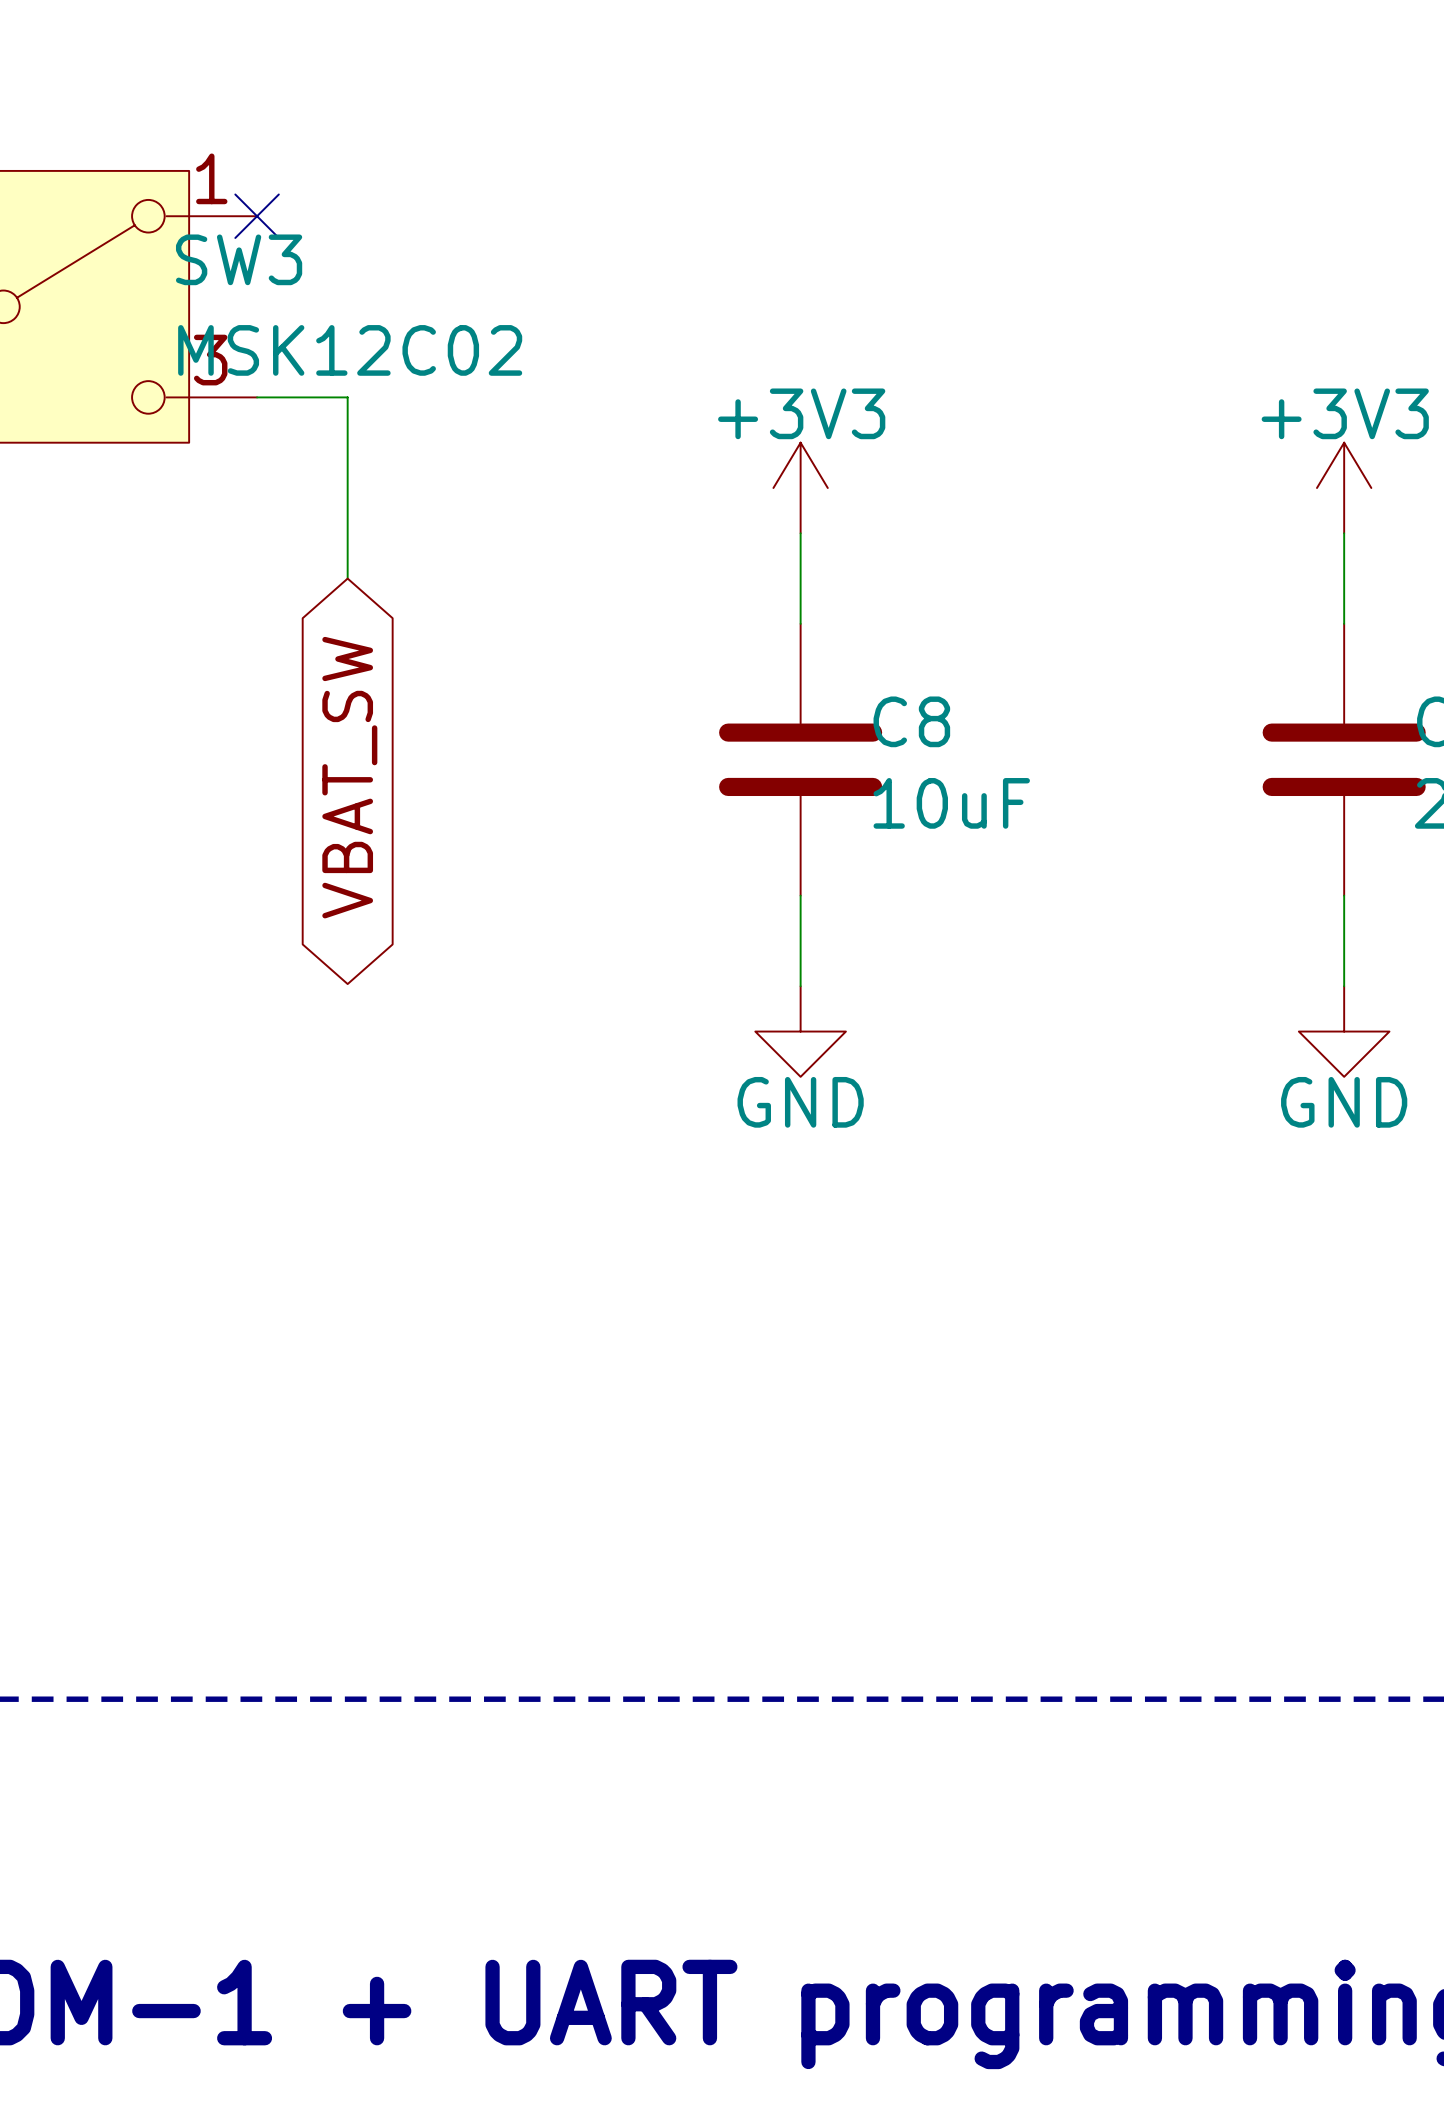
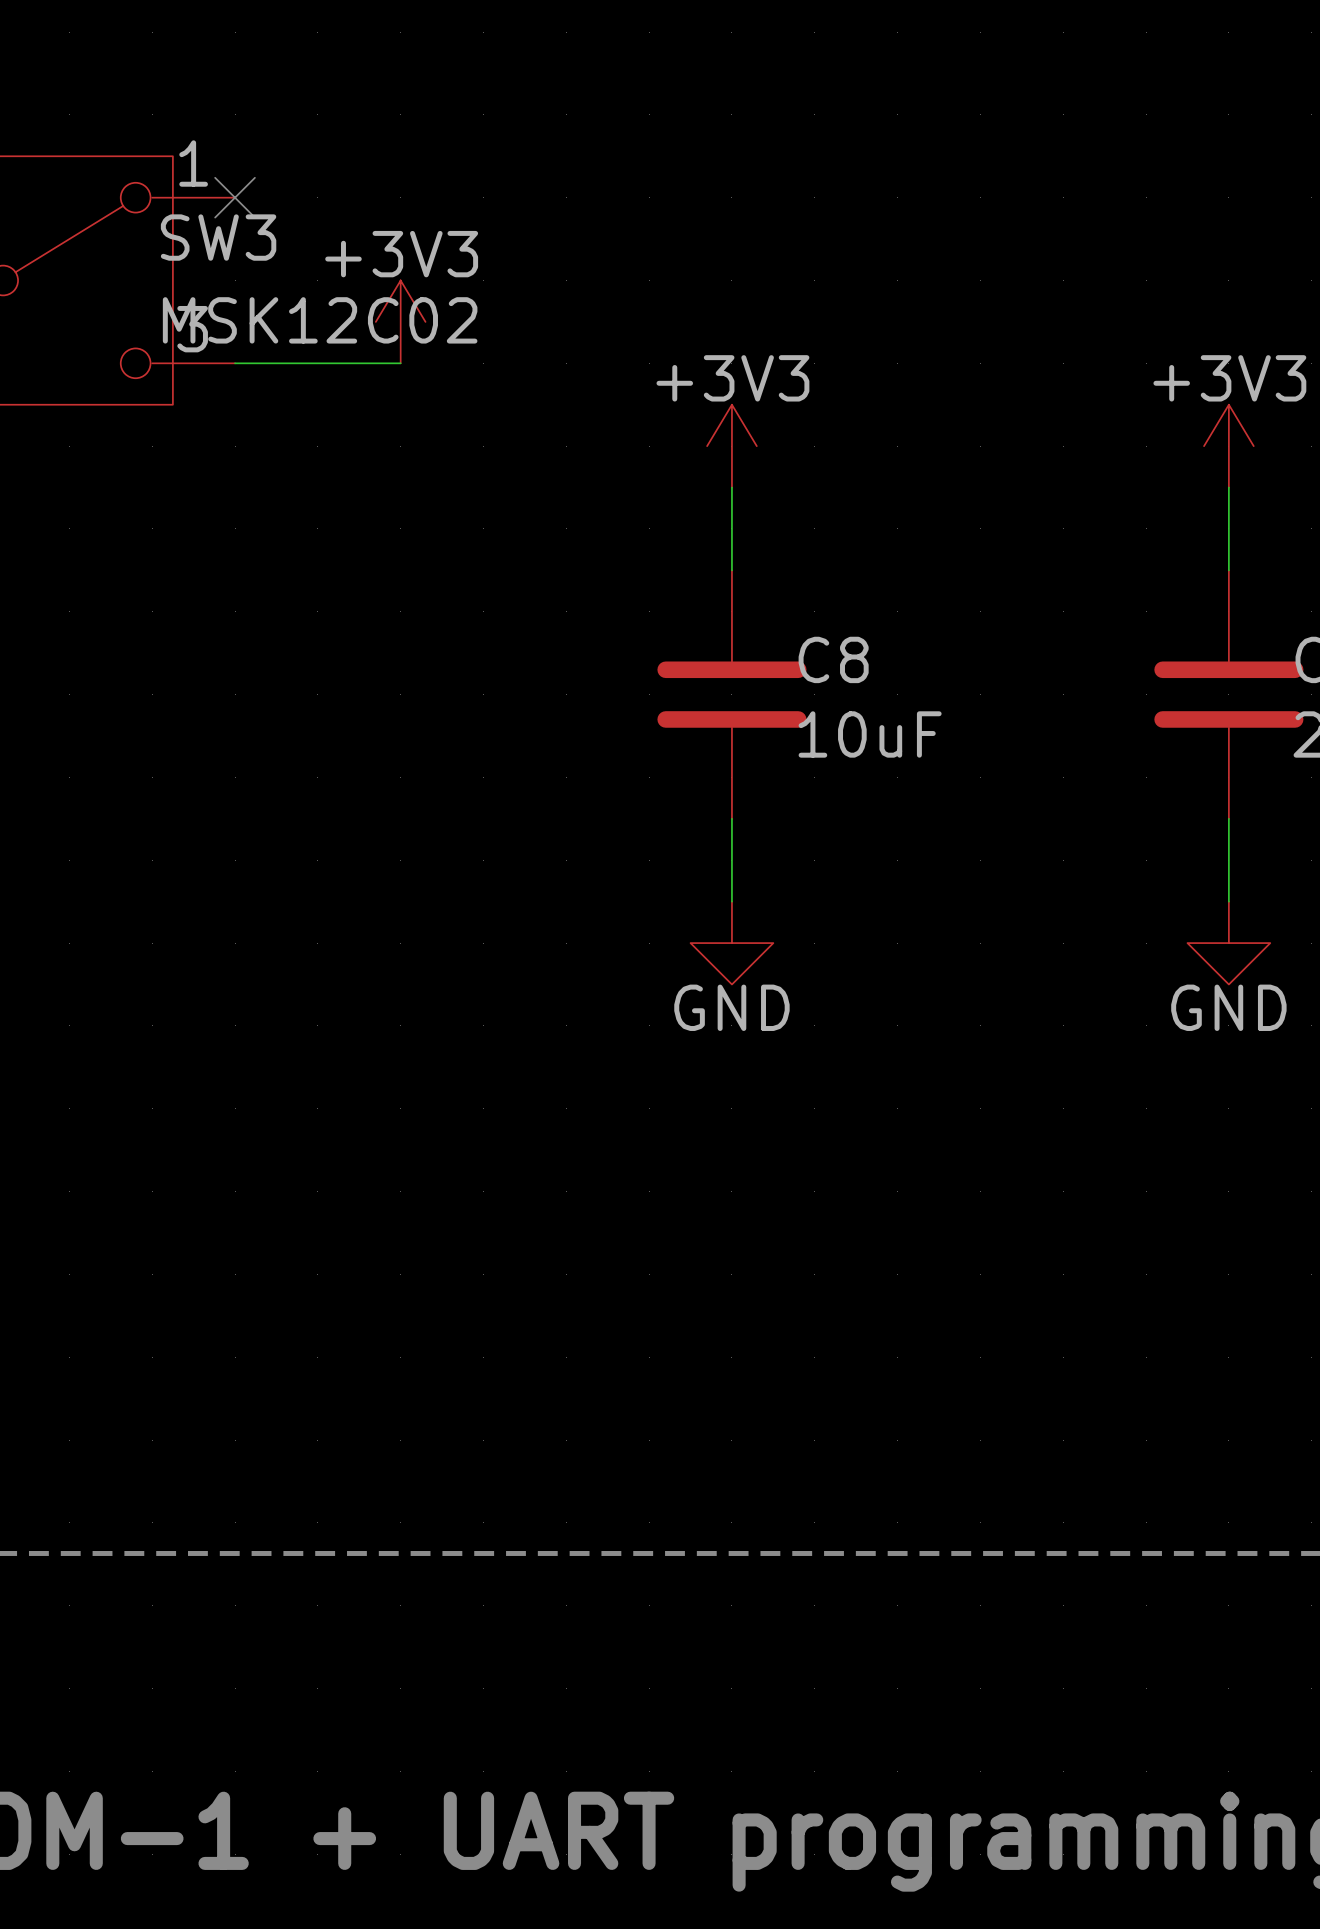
power symbol: none -> +3V3 (400, 321)
wire: (347, 397) (347, 578) -> (317, 363) (400, 363)
global label: VBAT_SW (349, 777) -> none

